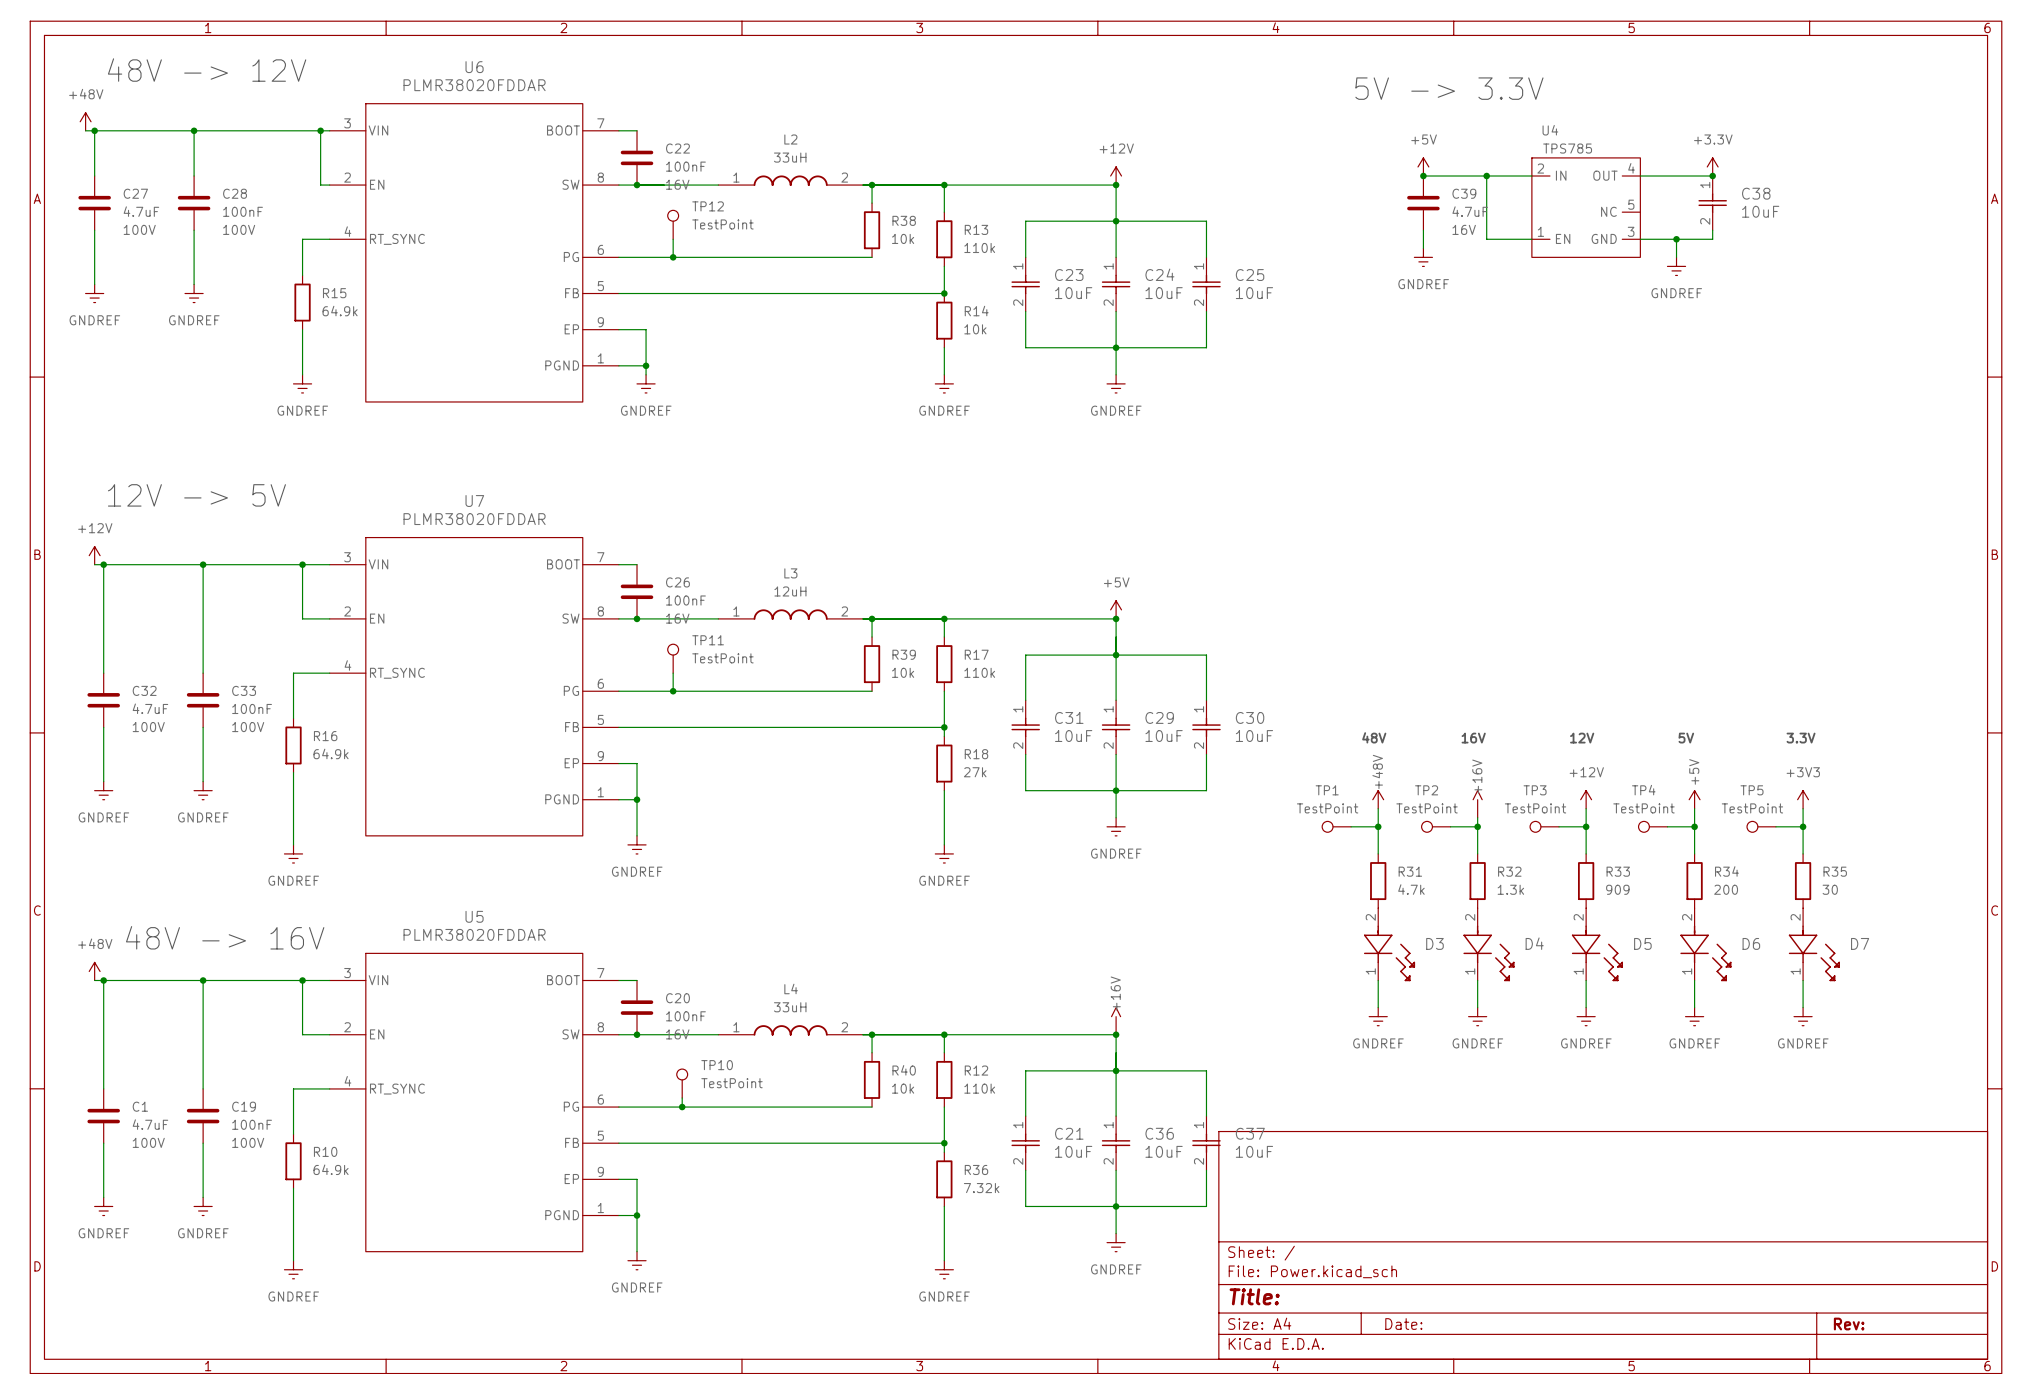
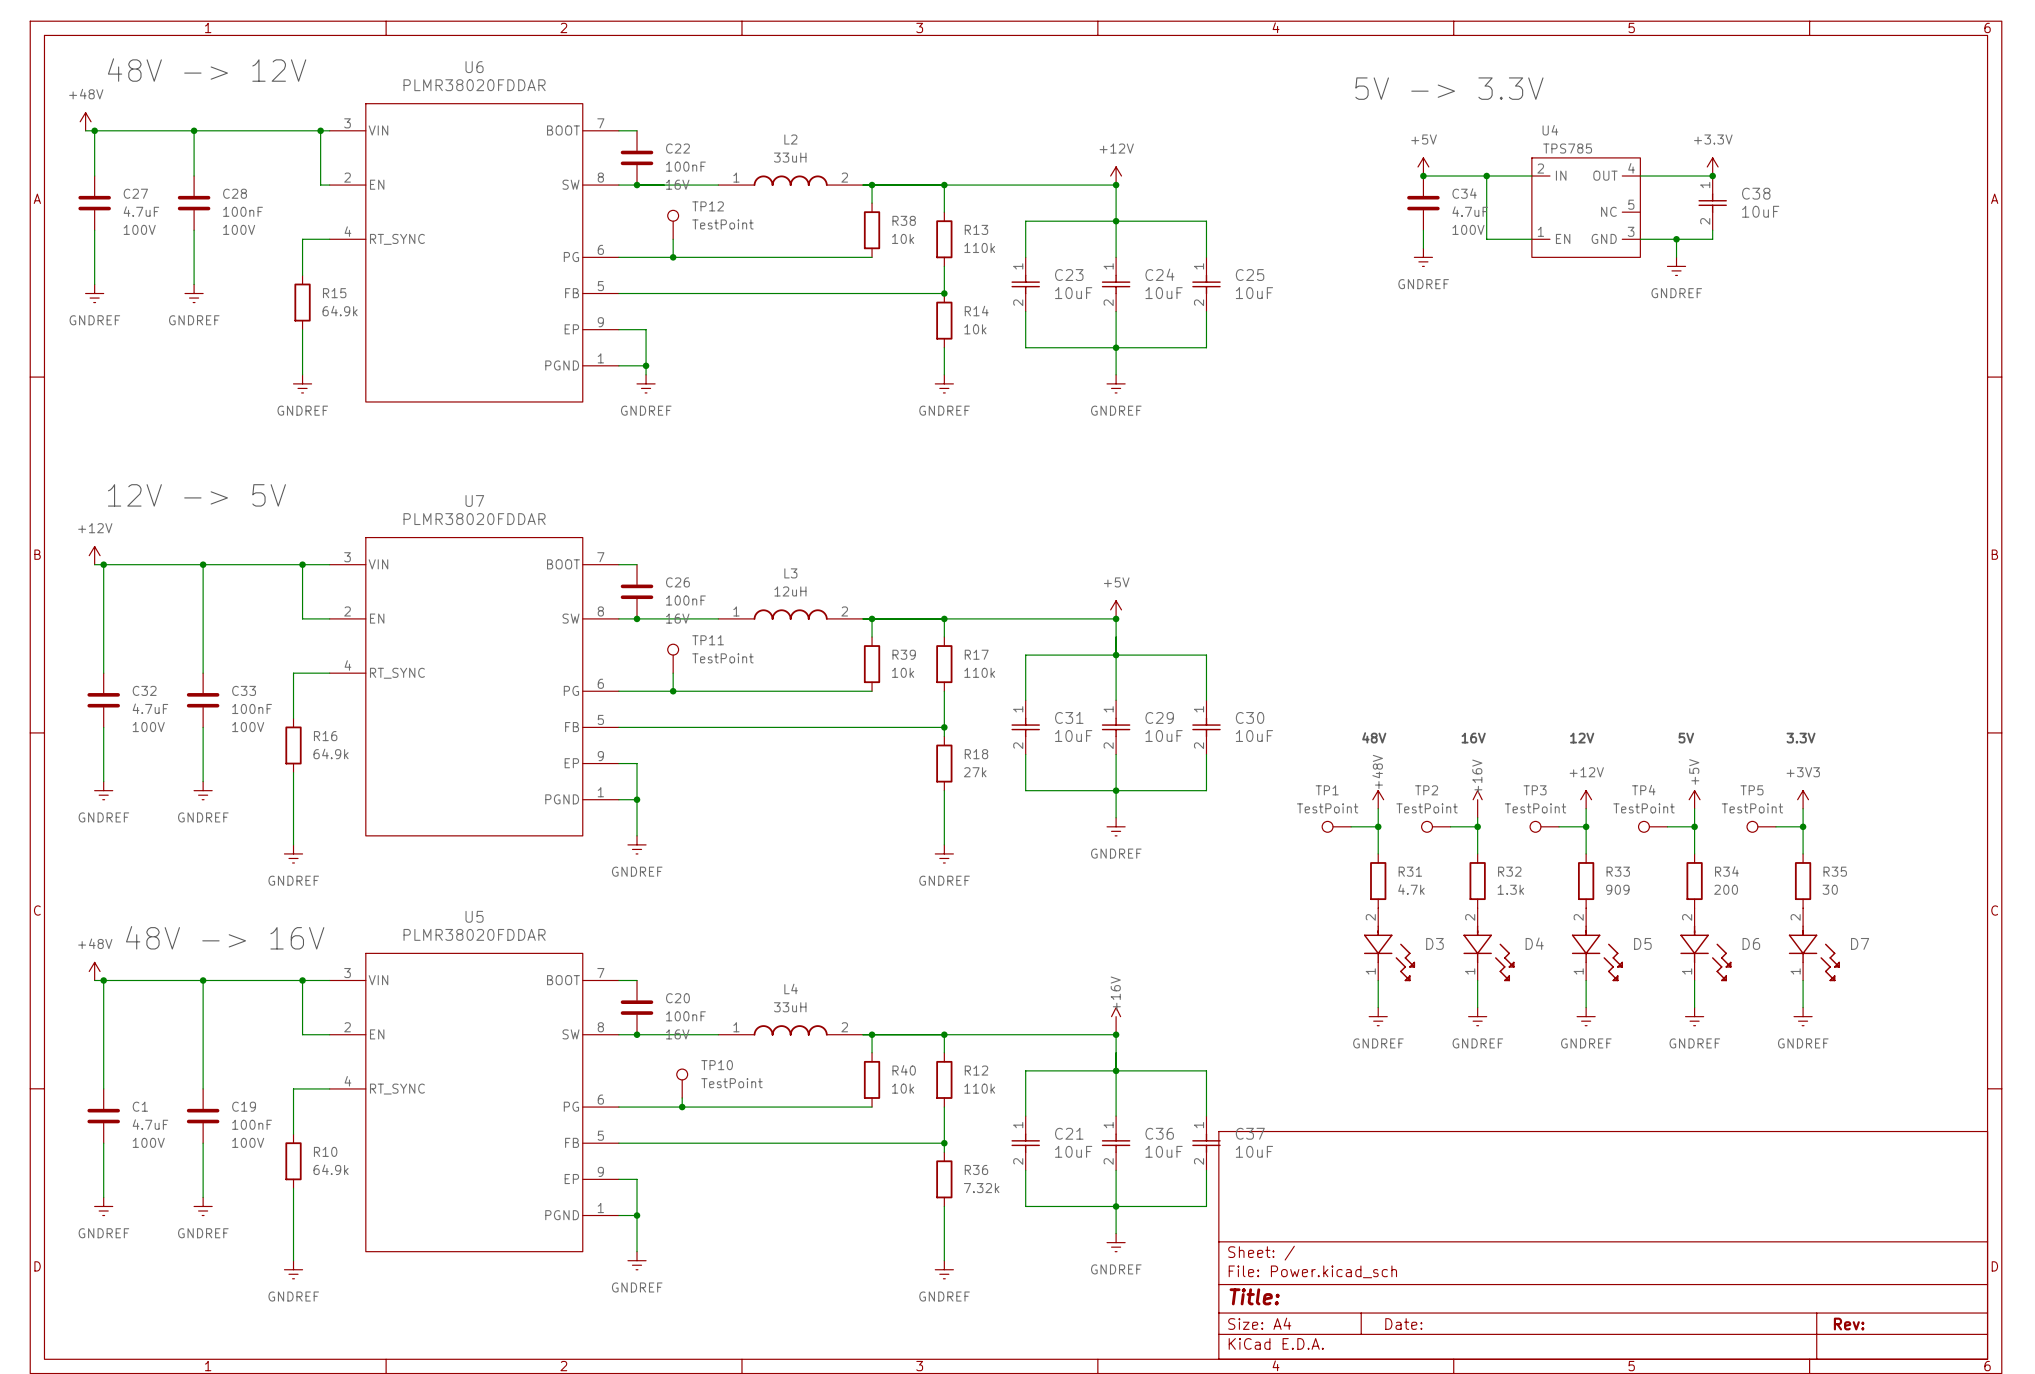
C39 name: C39 (1464, 193) -> C34 (1464, 193)
C39 text: 16V (1464, 229) -> 100V (1468, 229)

